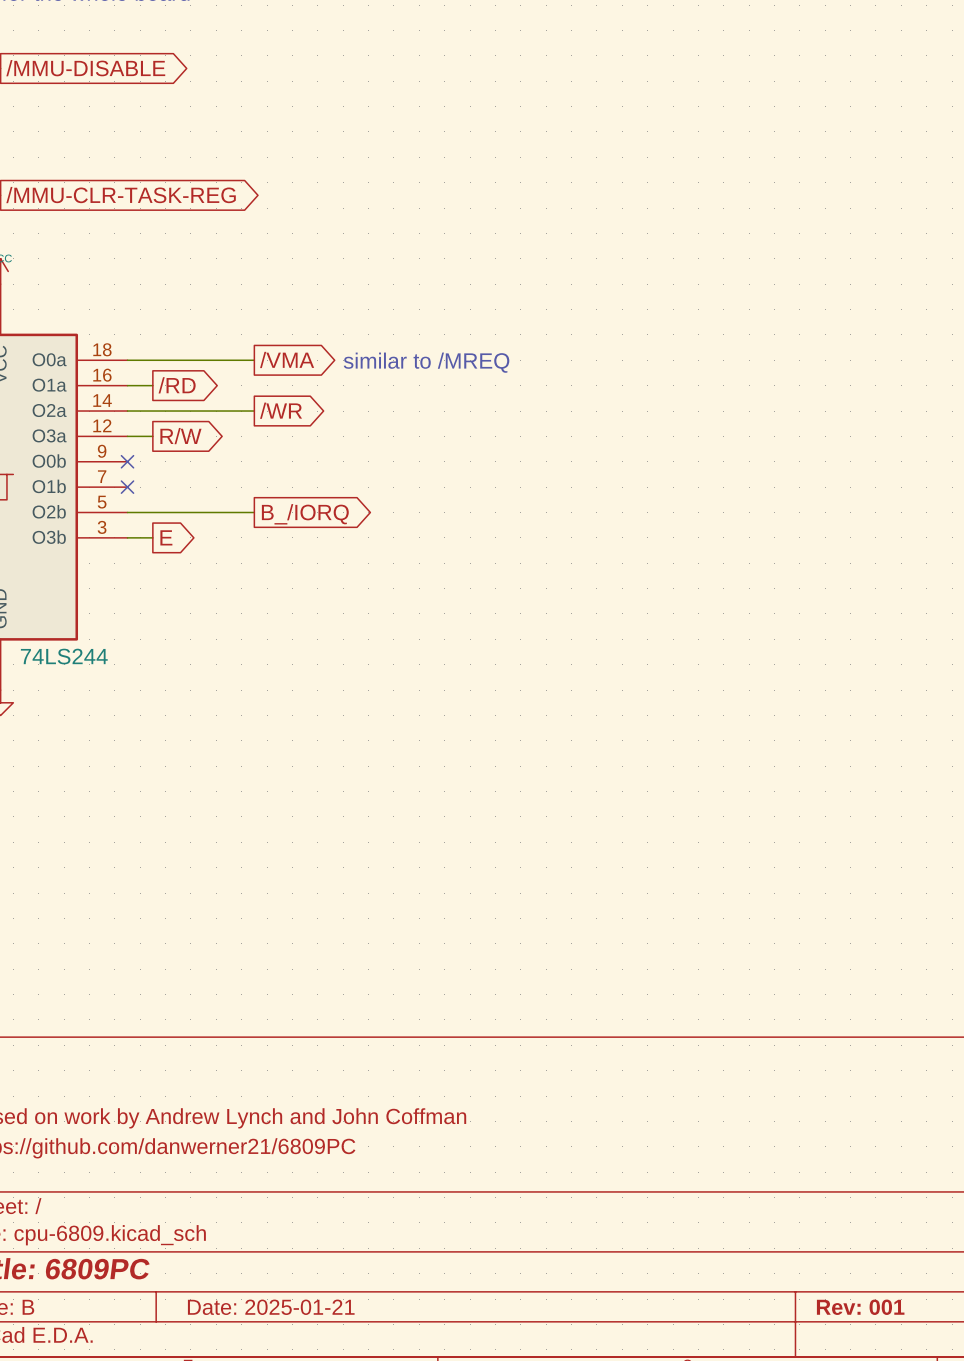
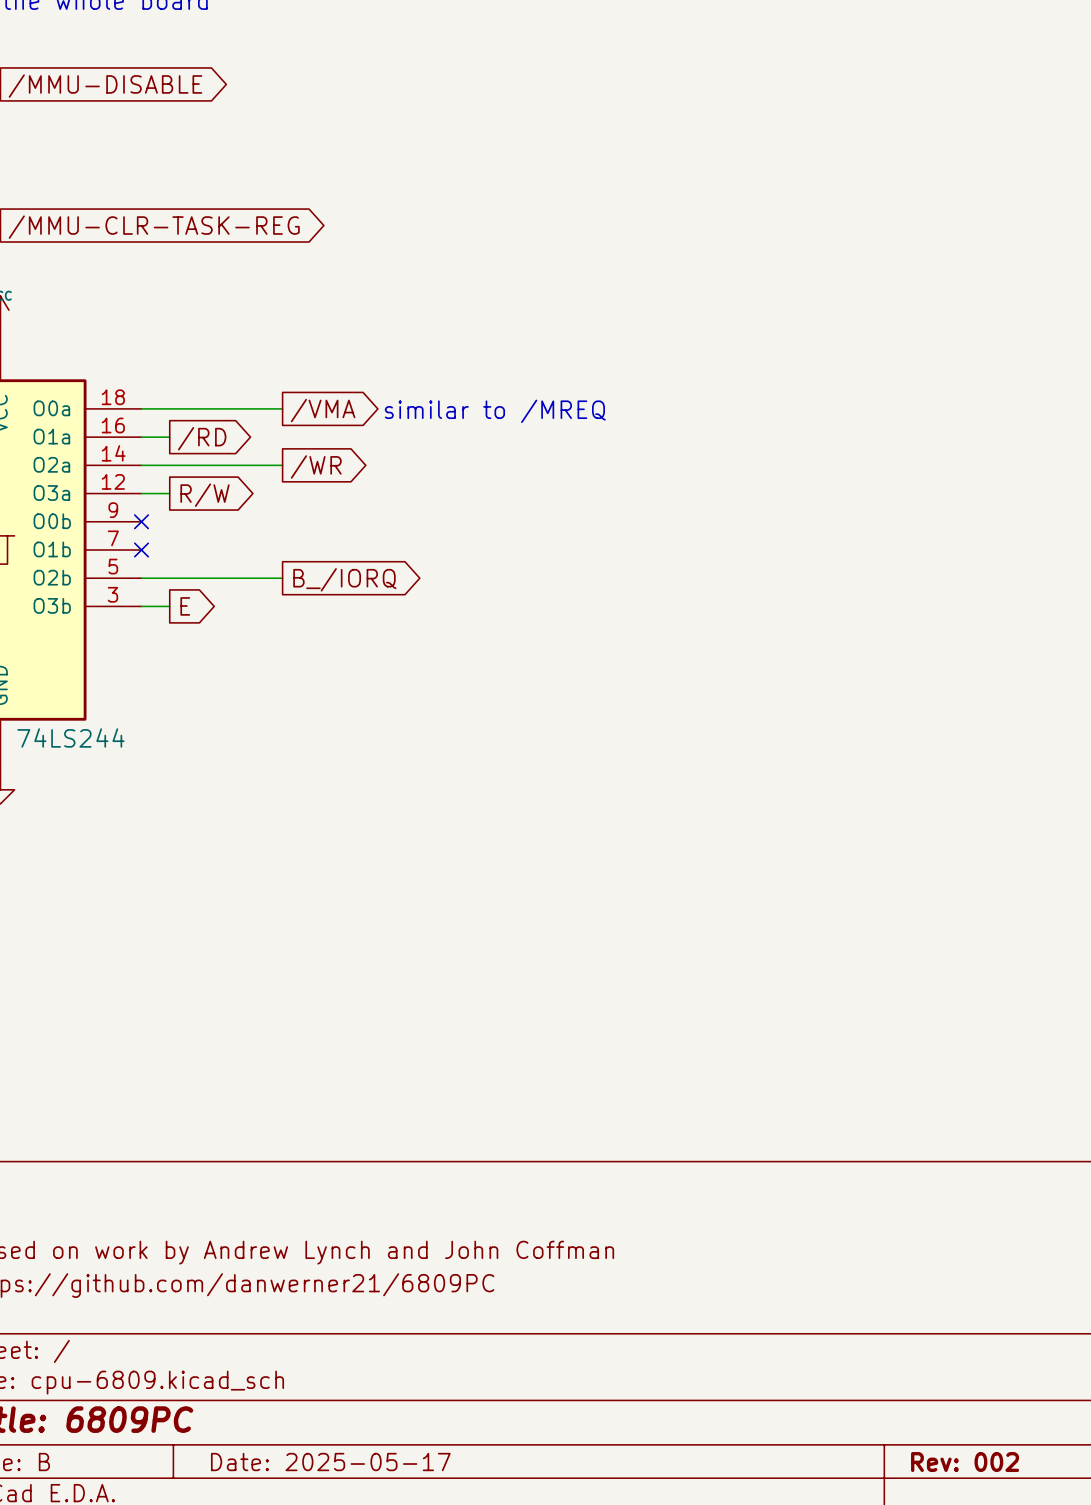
title block: Date: 2025-01-21 (271, 1307) -> Date: 2025-05-17 (330, 1462)
title block: Rev: 001 (860, 1307) -> Rev: 002 (965, 1462)

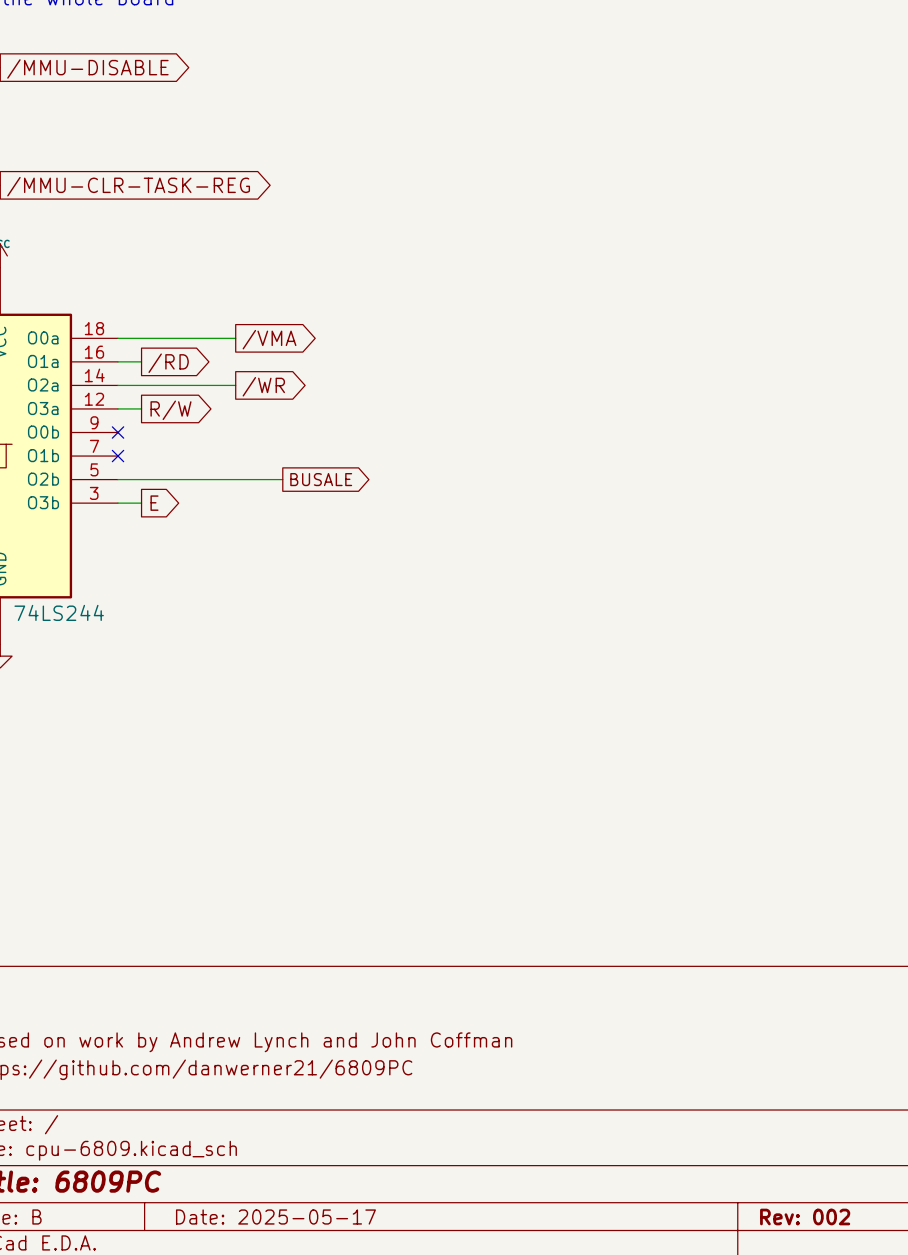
text: similar to /MREQ (495, 411) -> none
wire: none -> (235, 479) (282, 479)
global label: none -> BUSALE (321, 479)
global label: B_/IORQ (344, 579) -> none

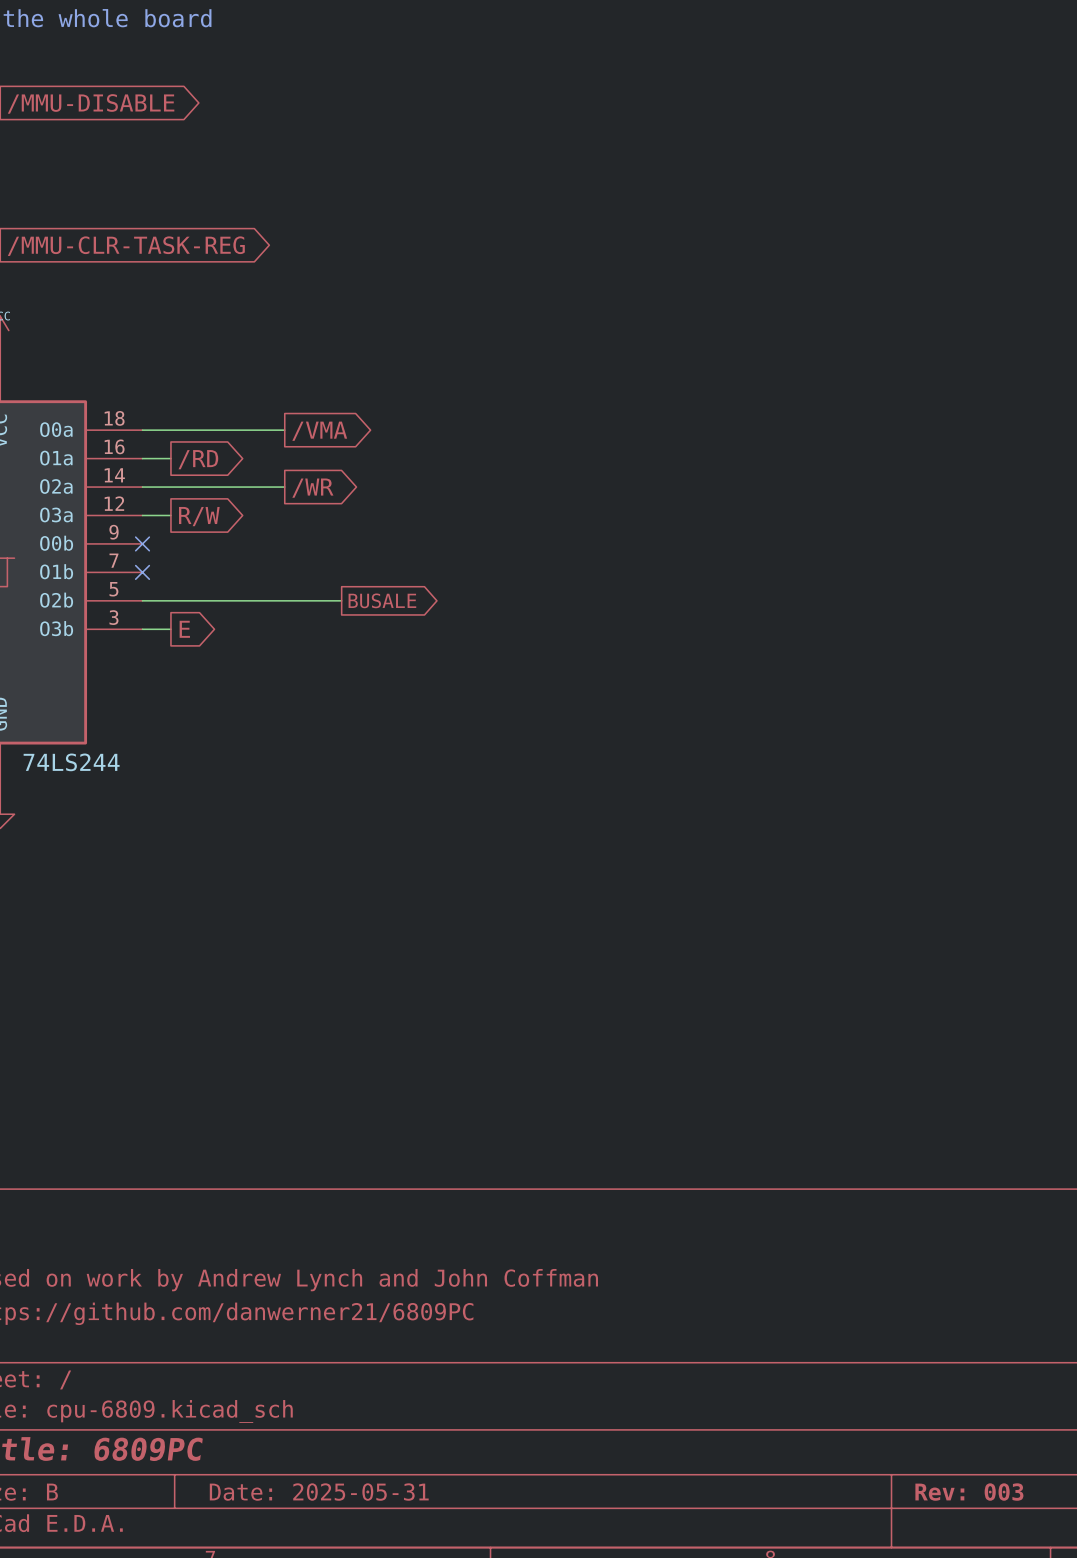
title block: Date: 2025-05-17 (275, 1217) -> Date: 2025-05-31 (319, 1492)
title block: Rev: 002 (805, 1217) -> Rev: 003 (969, 1492)

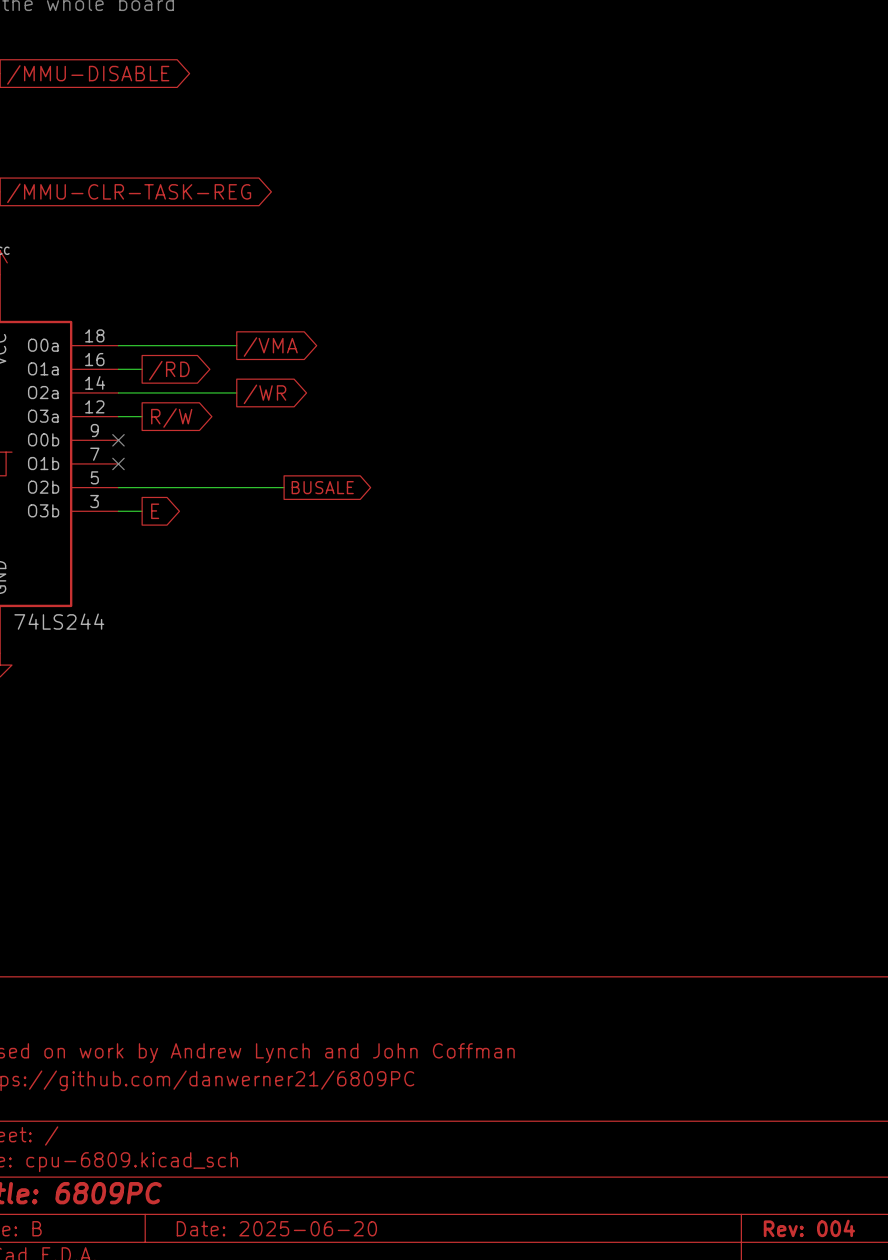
title block: Date: 2025-05-31 (319, 1492) -> Date: 2025-06-20 (276, 1228)
title block: Rev: 003 (969, 1492) -> Rev: 004 (809, 1228)

